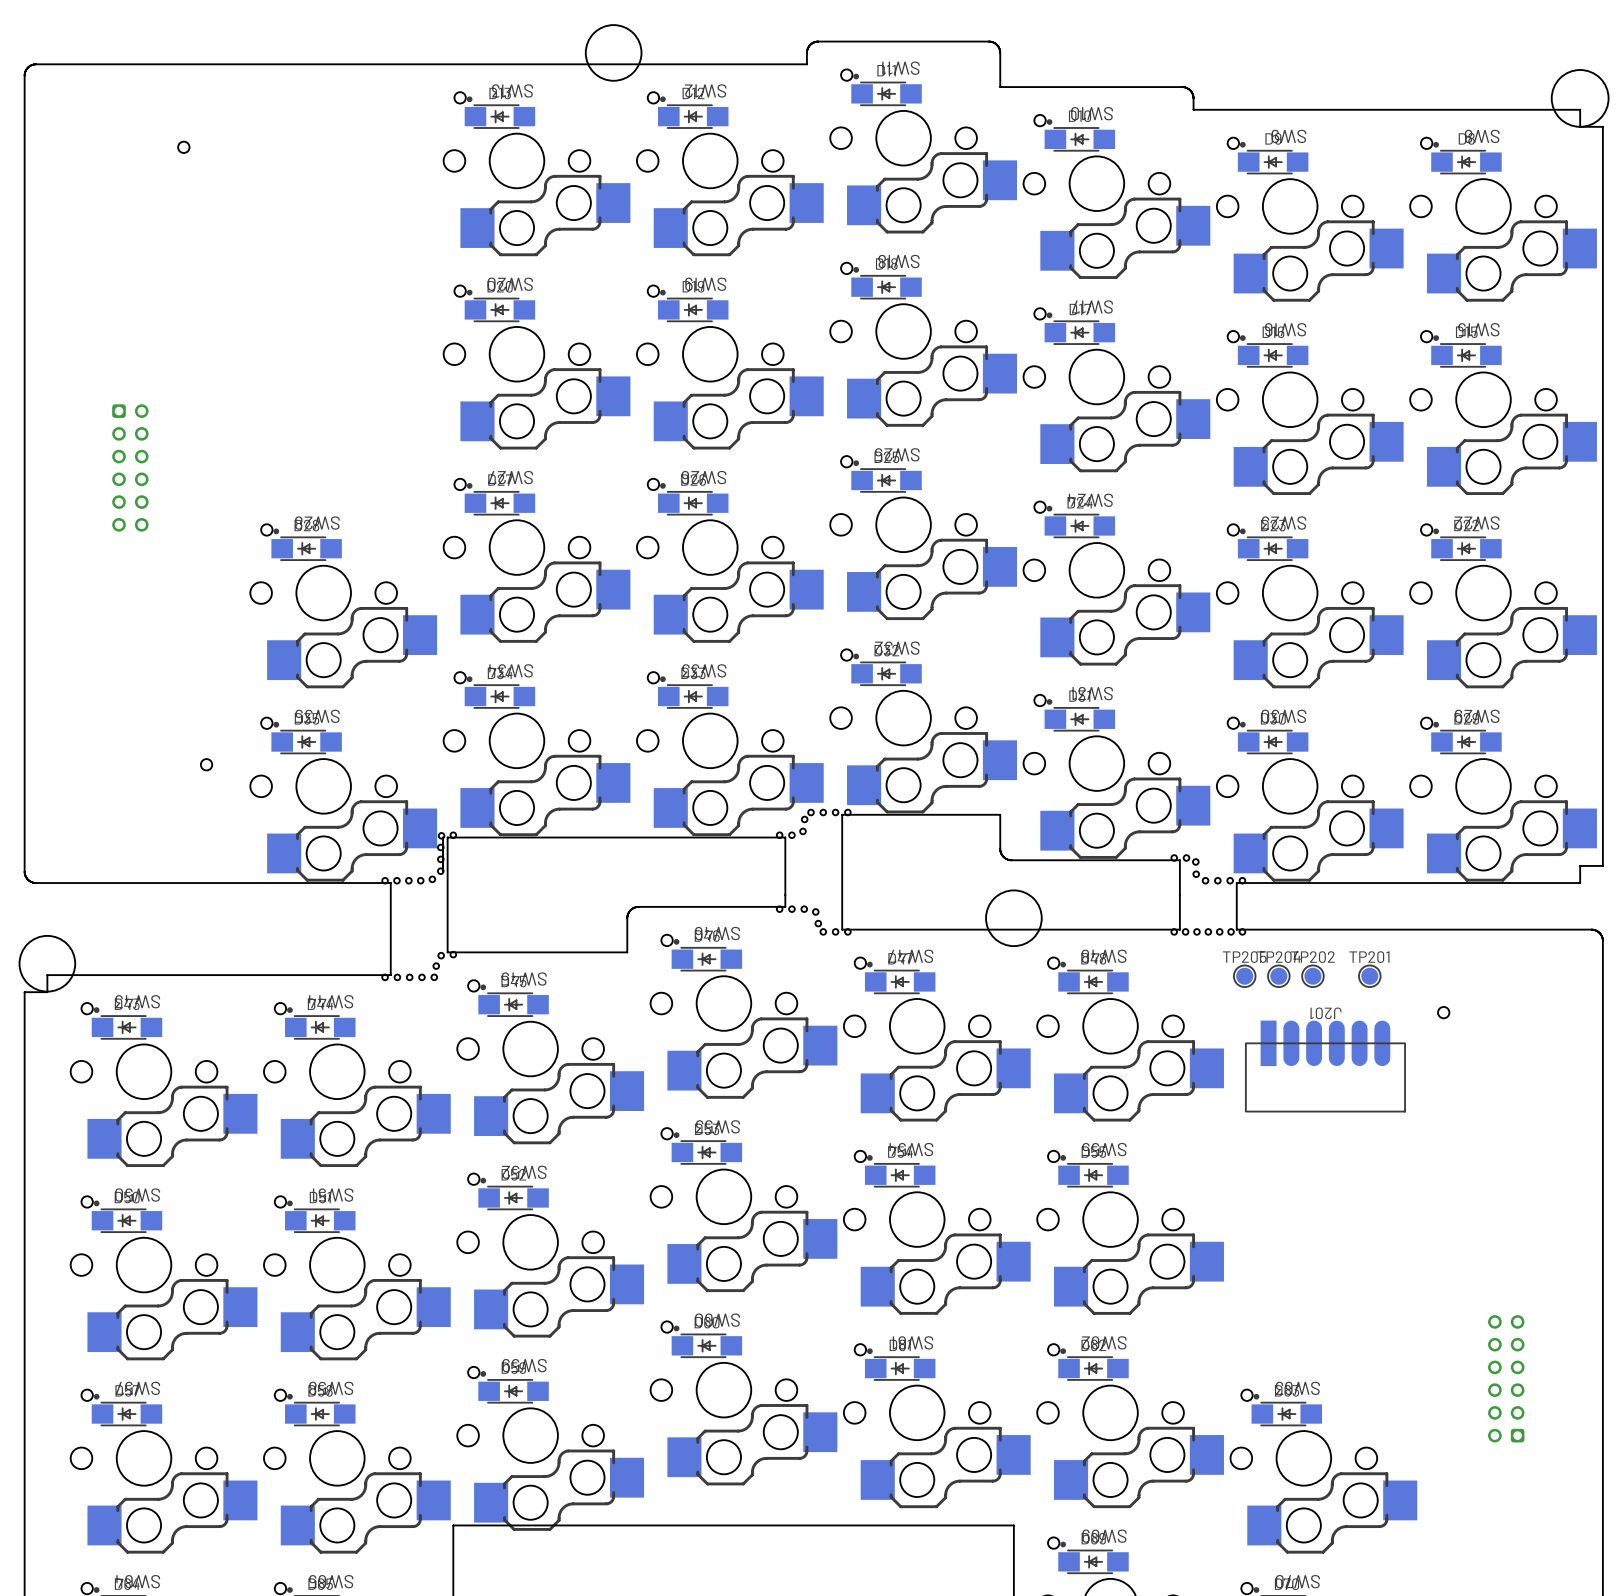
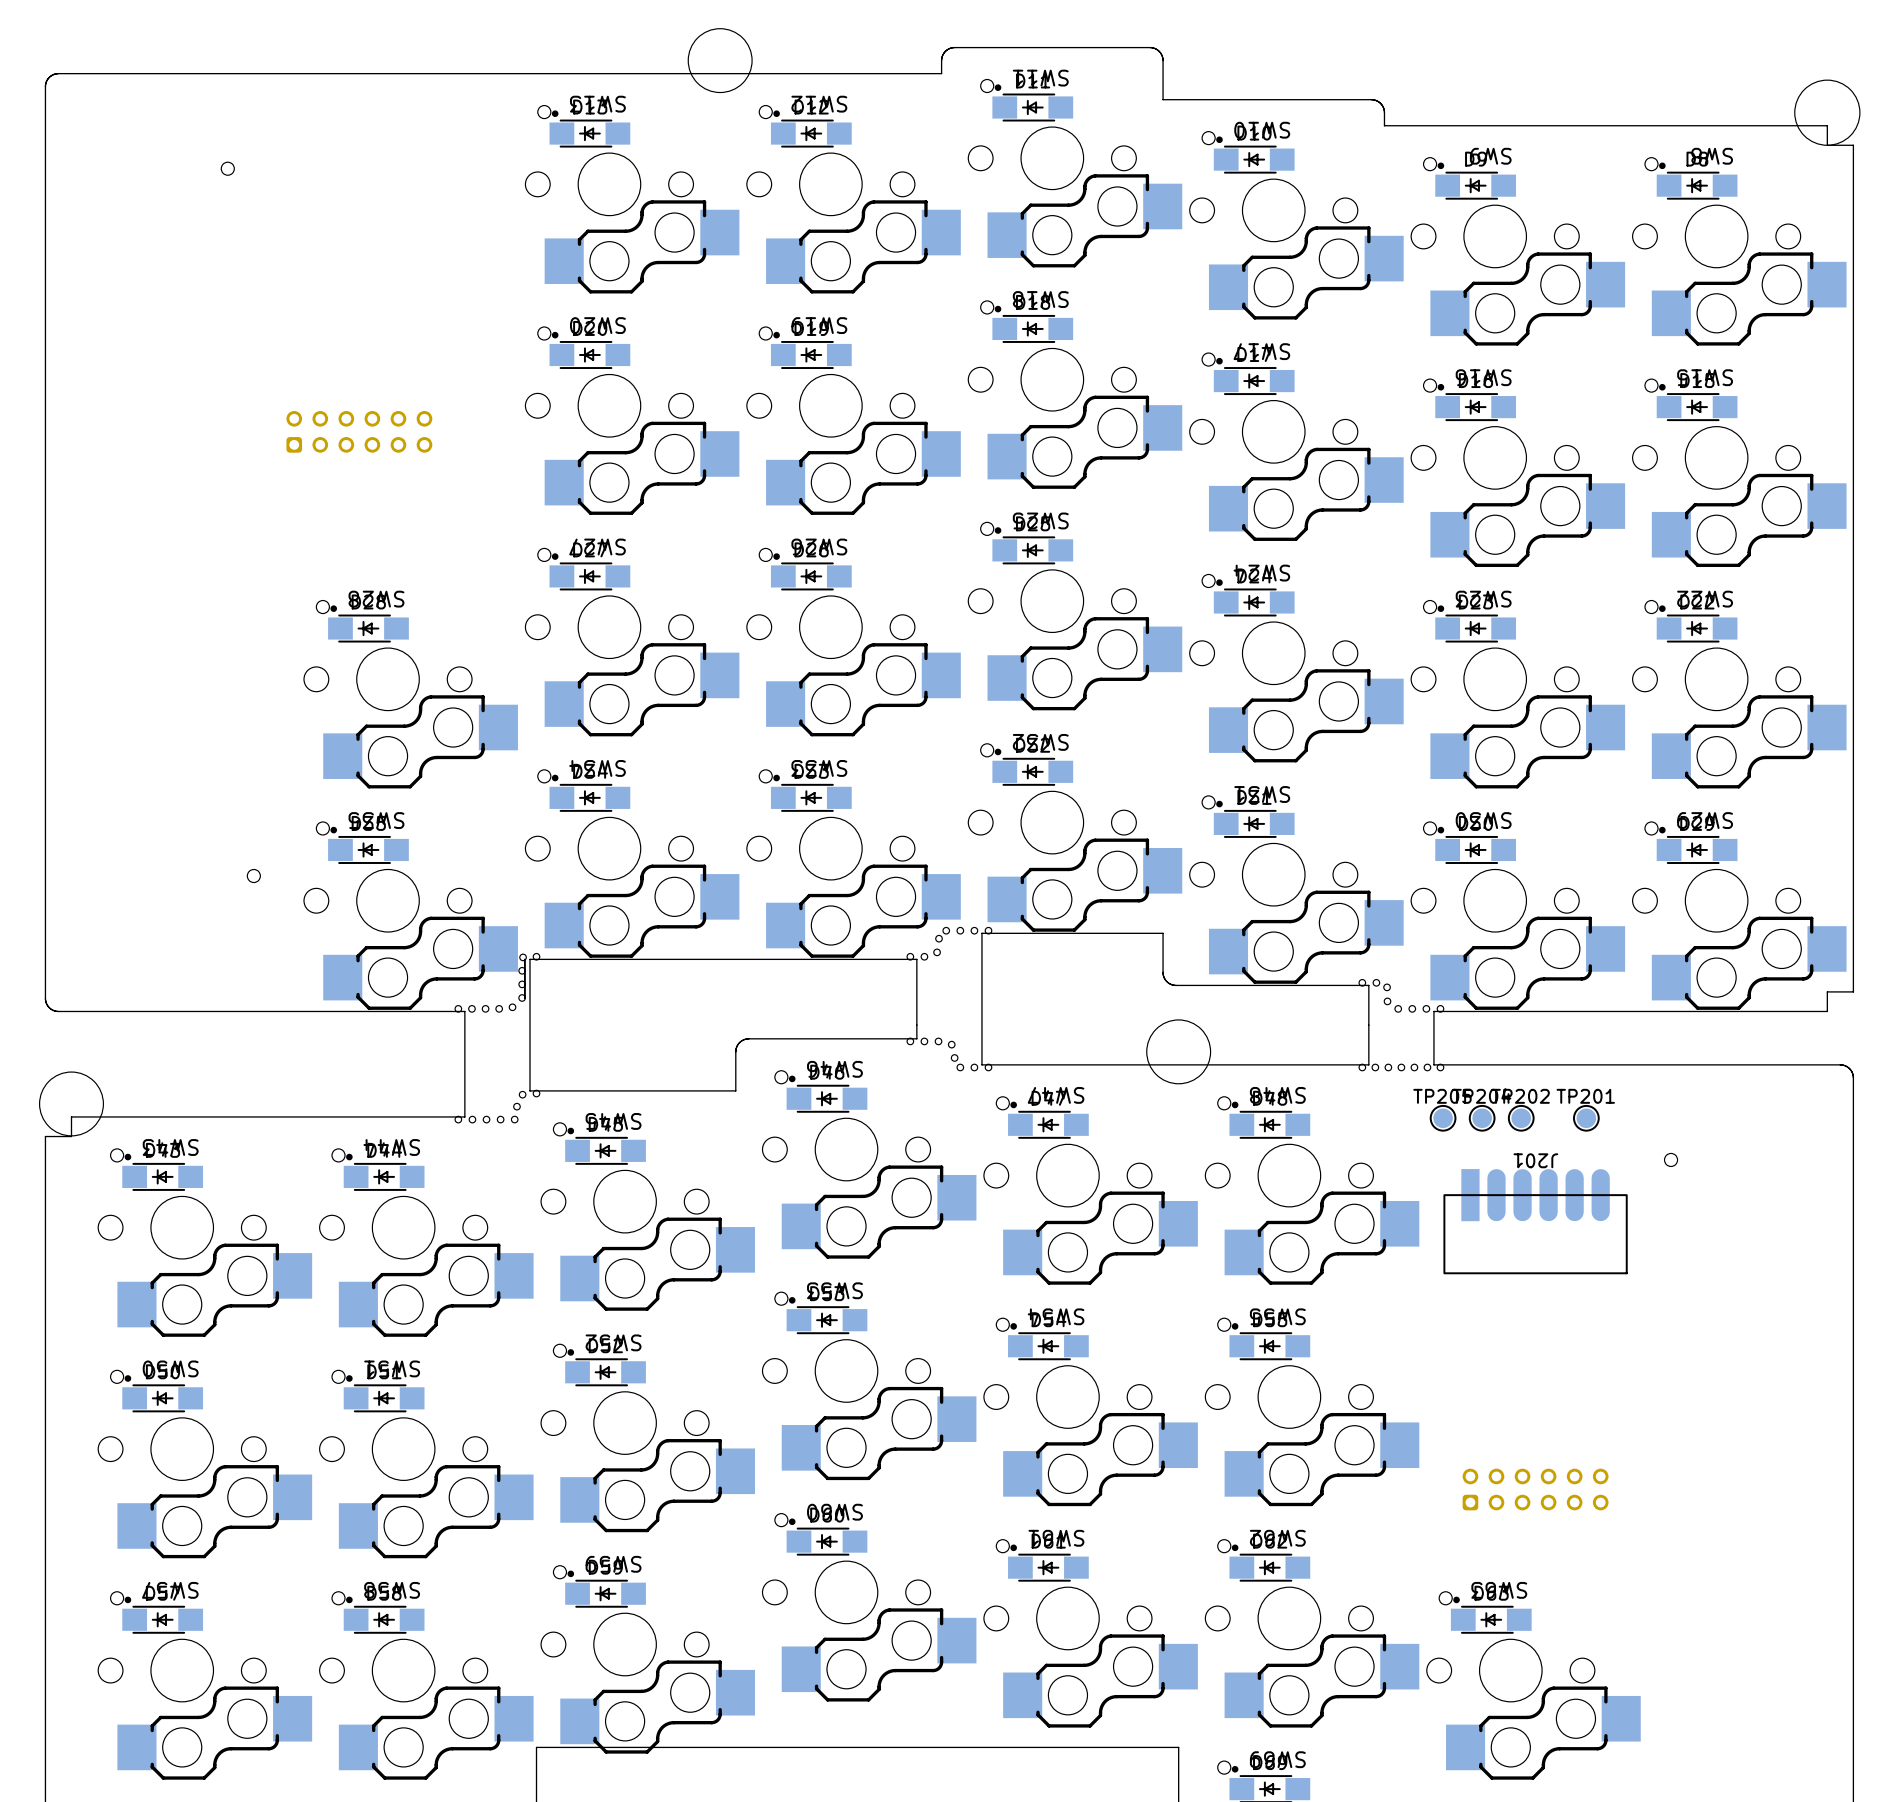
part rotation: 0° (130, 467) -> 90° counterclockwise (359, 431)
part position: (130, 467) -> (359, 431)
part rotation: 0° (1506, 1378) -> 90° clockwise (1535, 1489)
part position: (1506, 1378) -> (1535, 1489)

